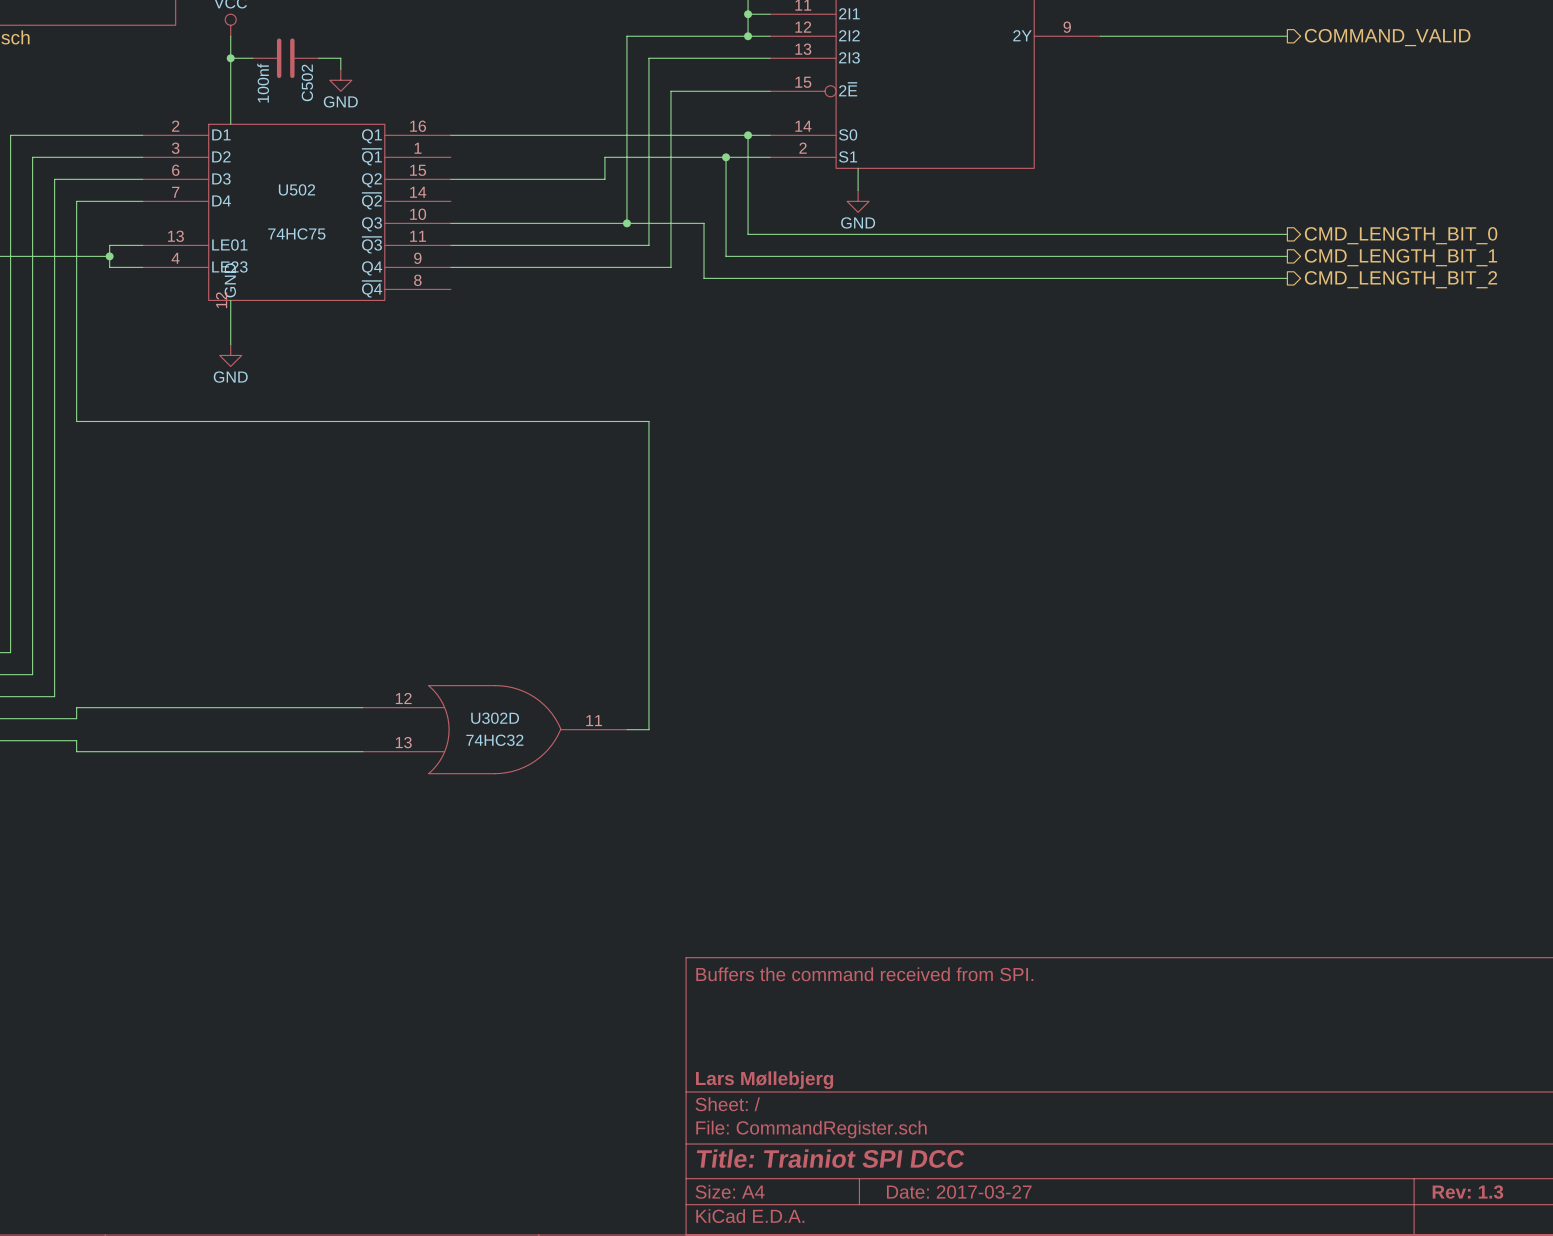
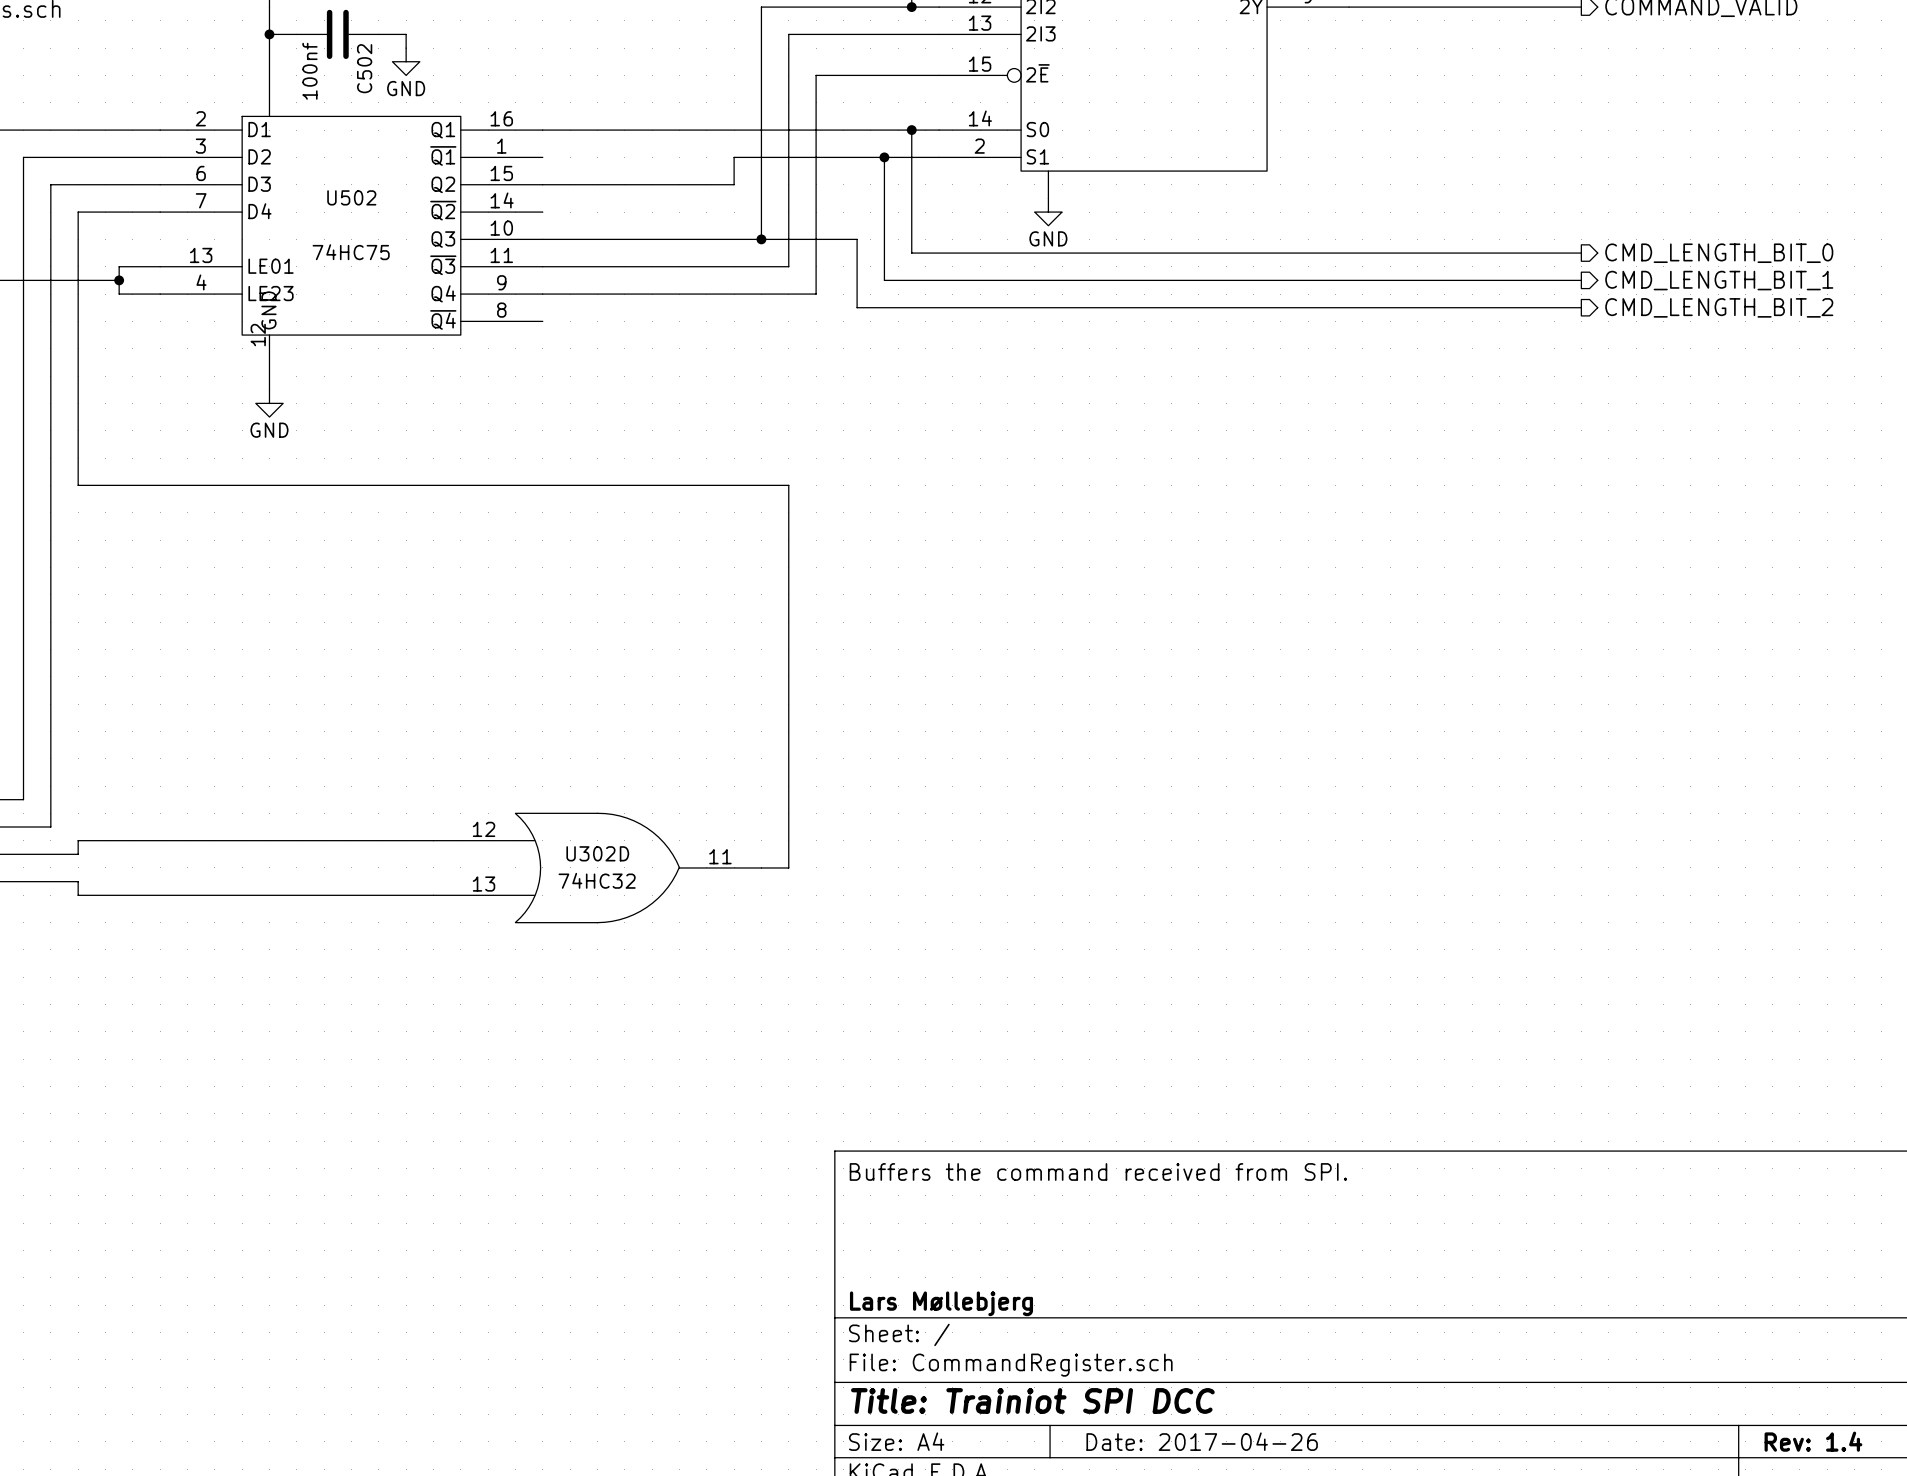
title block: Date: 2017-03-27 (959, 1192) -> Date: 2017-04-26 (1202, 1441)
title block: Rev: 1.3 (1467, 1192) -> Rev: 1.4 (1813, 1441)

